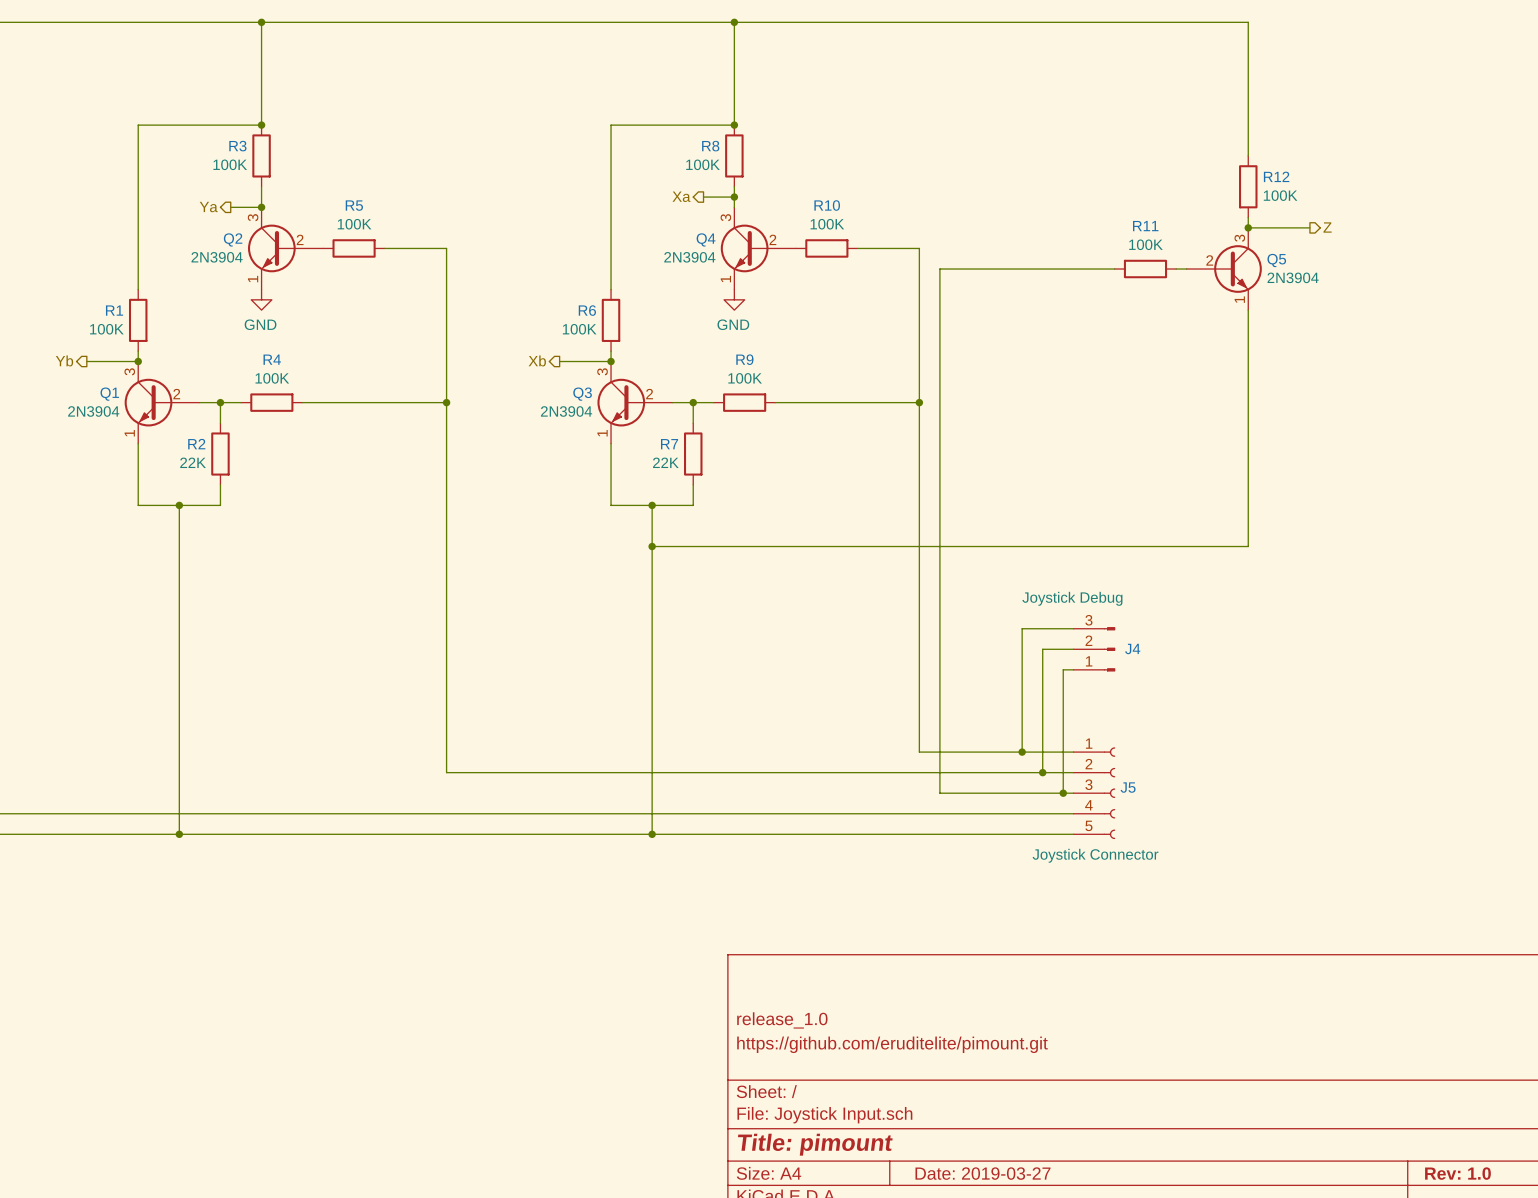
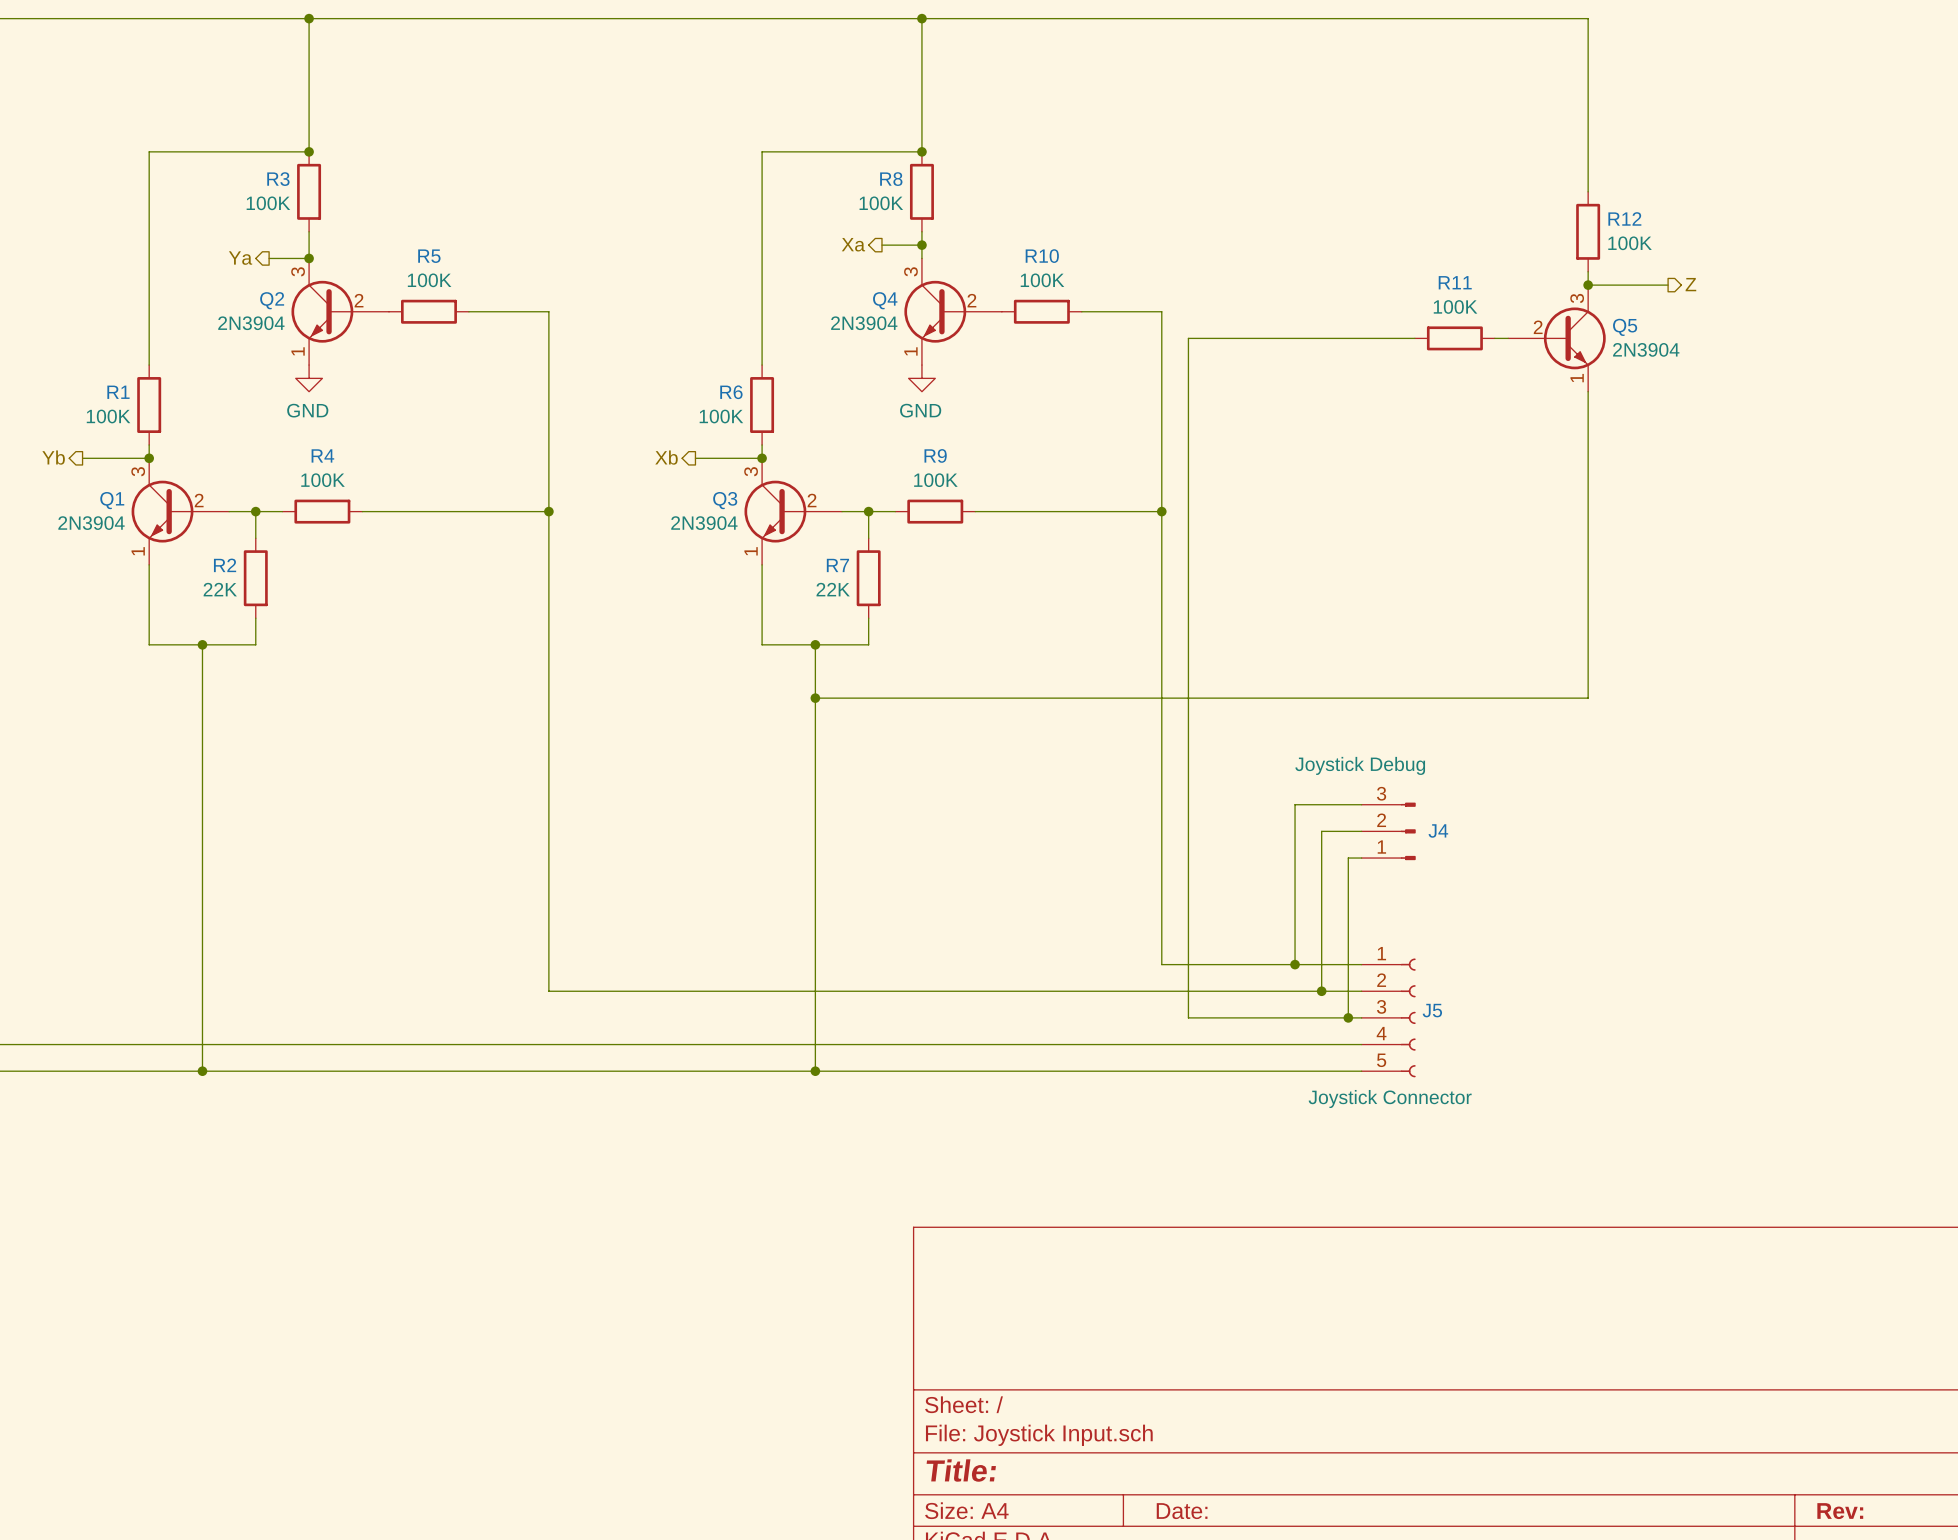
title block: release_1.0 (782, 1020) -> none
title block: https://github.com/eruditelite/pimount.git (892, 1044) -> none
title block: Title: pimount (815, 1144) -> Title: (961, 1470)
title block: Date: 2019-03-27 (982, 1173) -> Date: (1182, 1511)
title block: Rev: 1.0 (1457, 1173) -> Rev: (1840, 1511)

